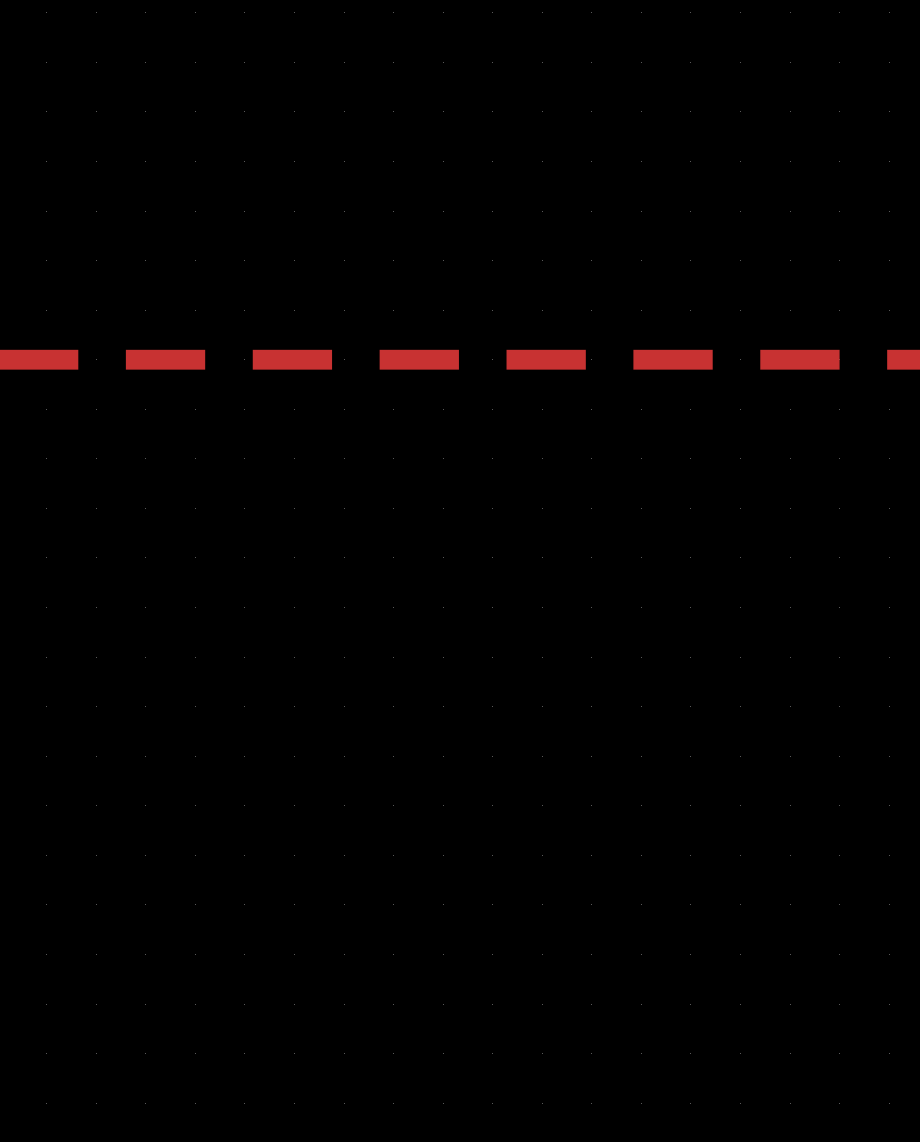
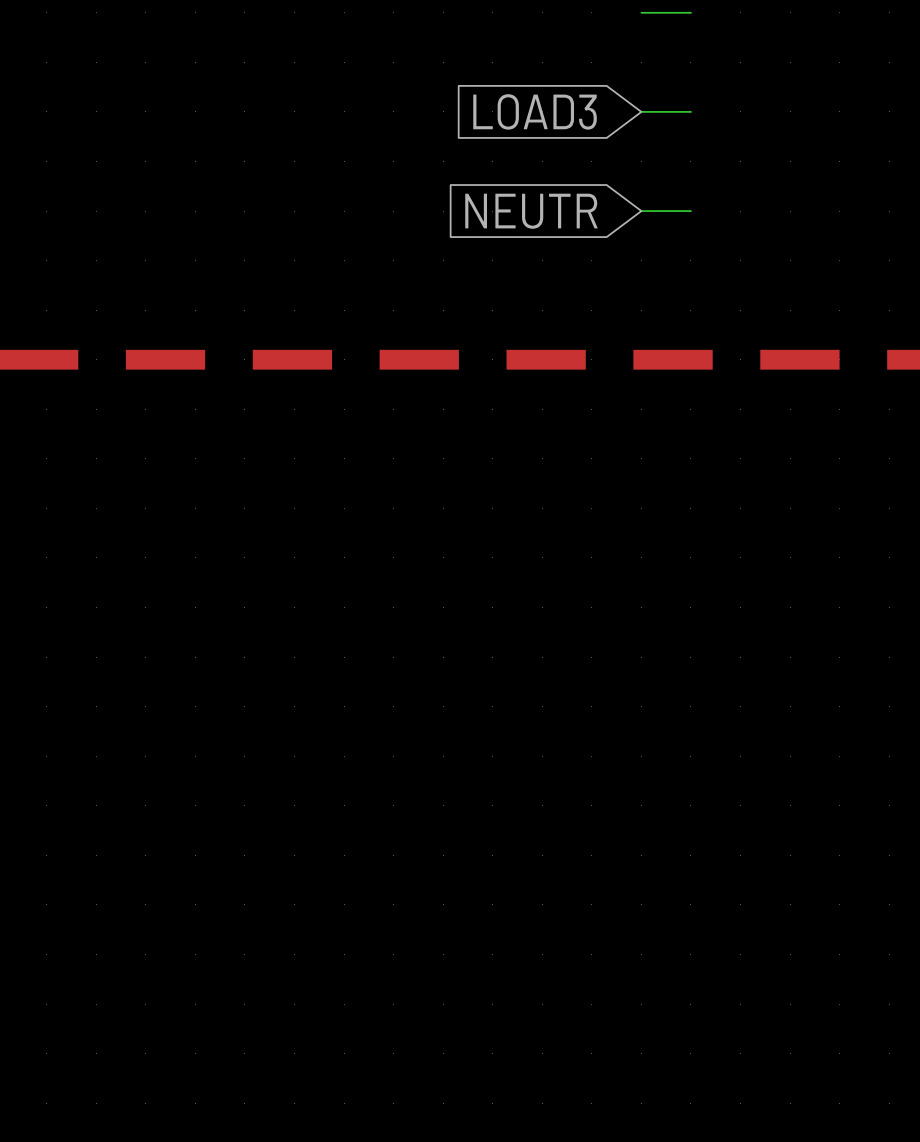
wire: none -> (641, 12) (690, 12)
global label: none -> LOAD3 (535, 111)
wire: none -> (641, 111) (690, 111)
global label: none -> NEUTR (531, 211)
wire: none -> (641, 211) (690, 211)

